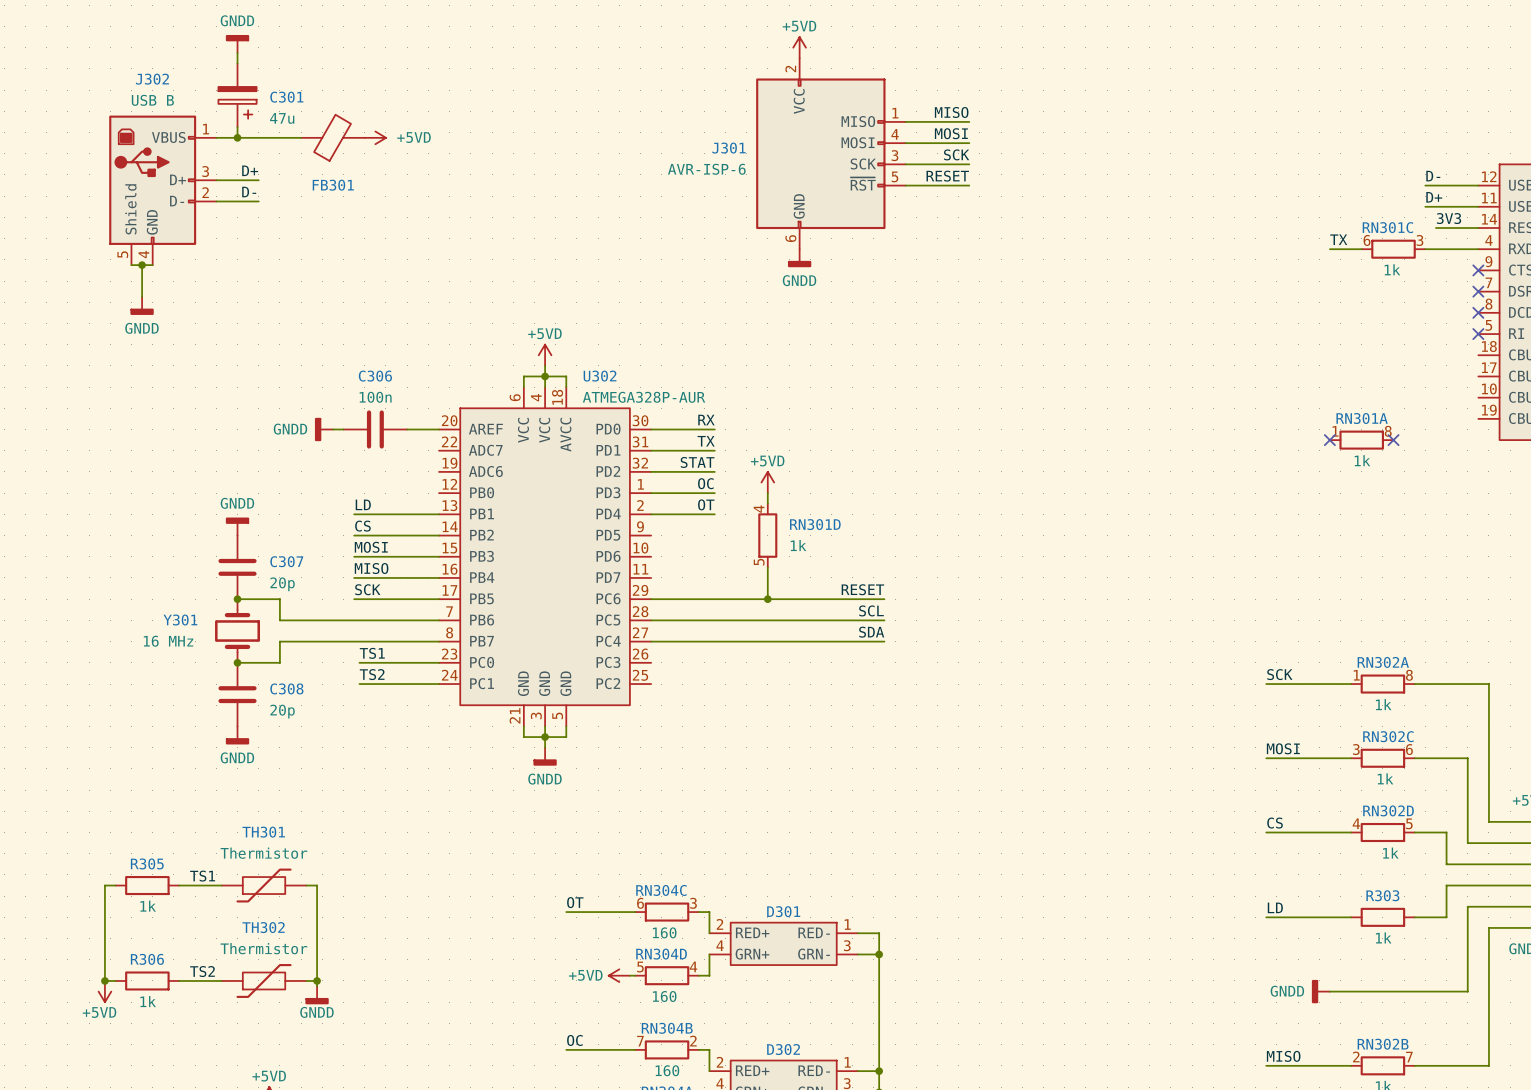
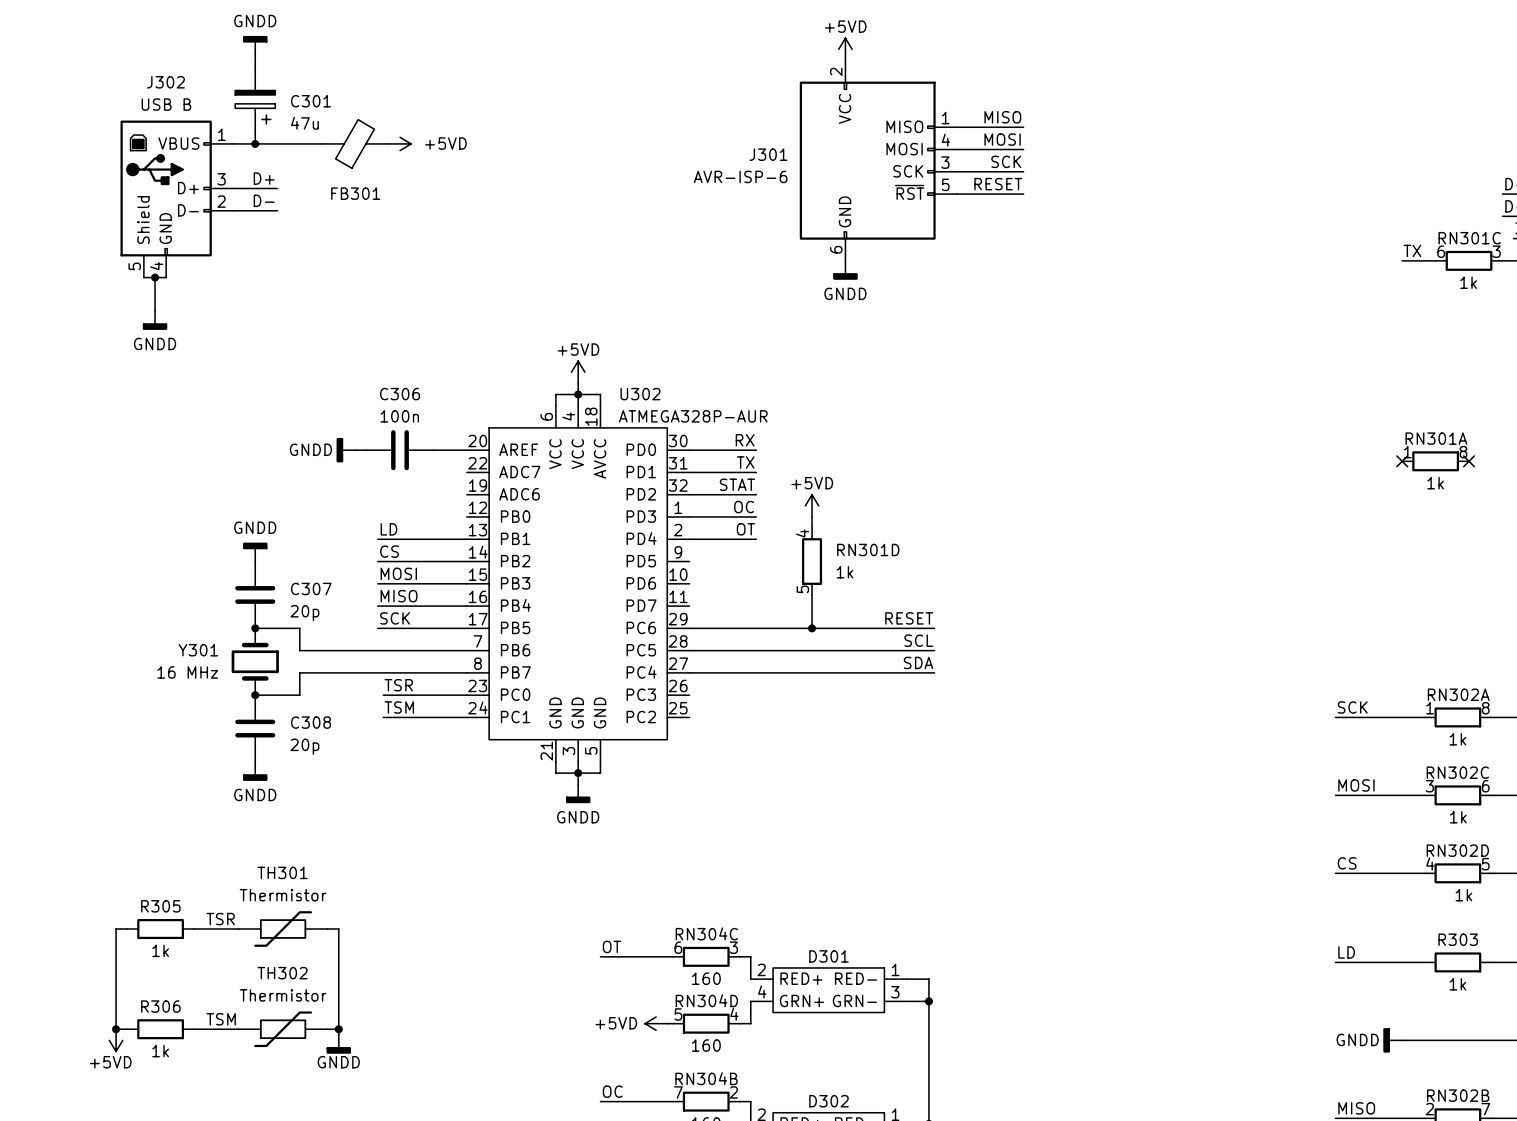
label: TS1 (372, 653) -> TSR (398, 685)
label: TS2 (372, 674) -> TSM (399, 707)
label: TS1 (202, 876) -> TSR (220, 919)
label: TS2 (202, 971) -> TSM (221, 1019)

